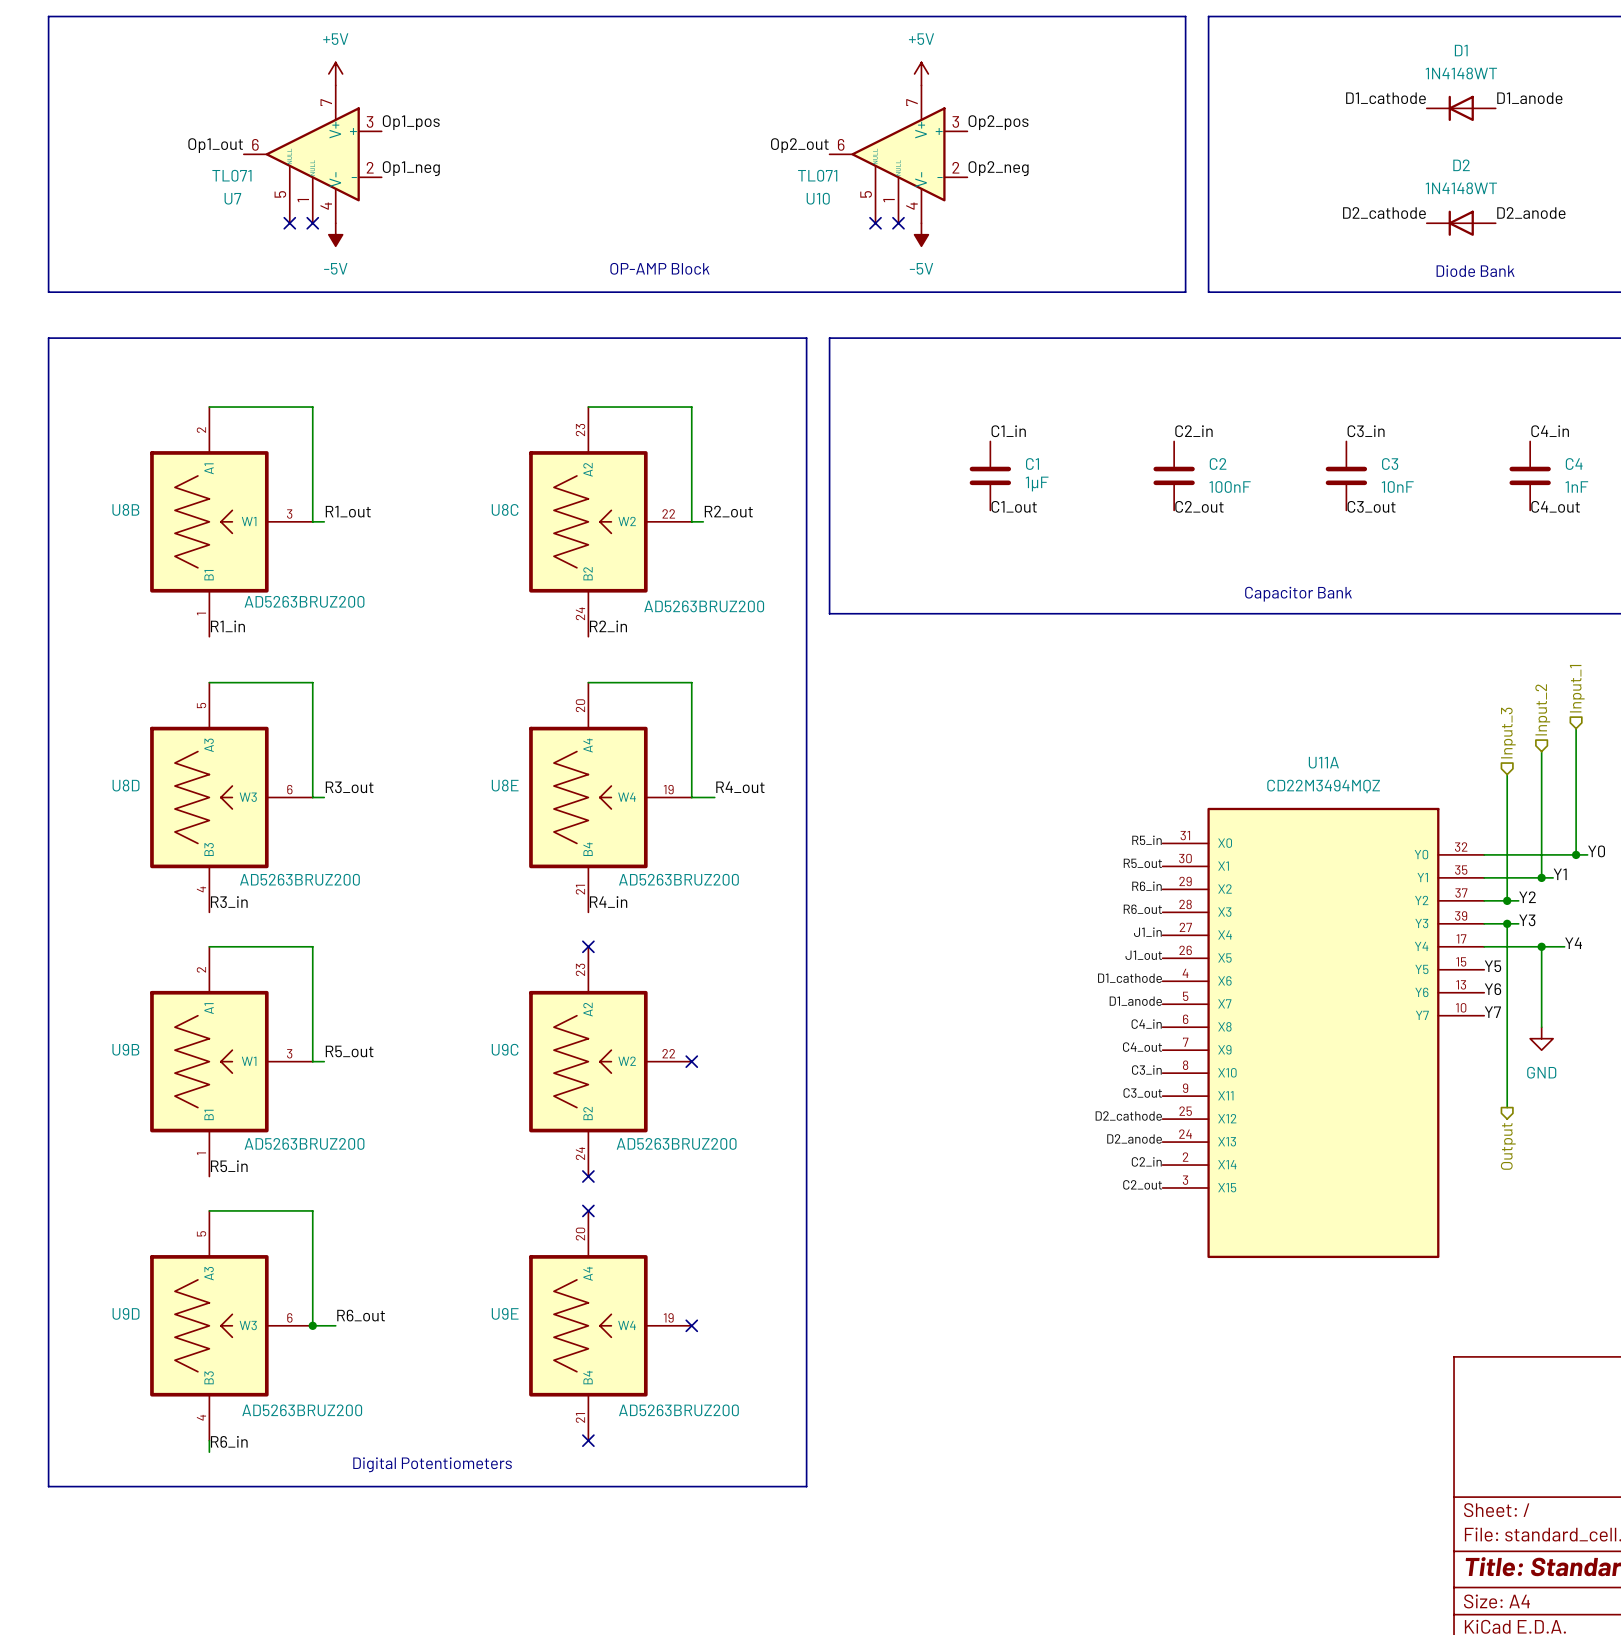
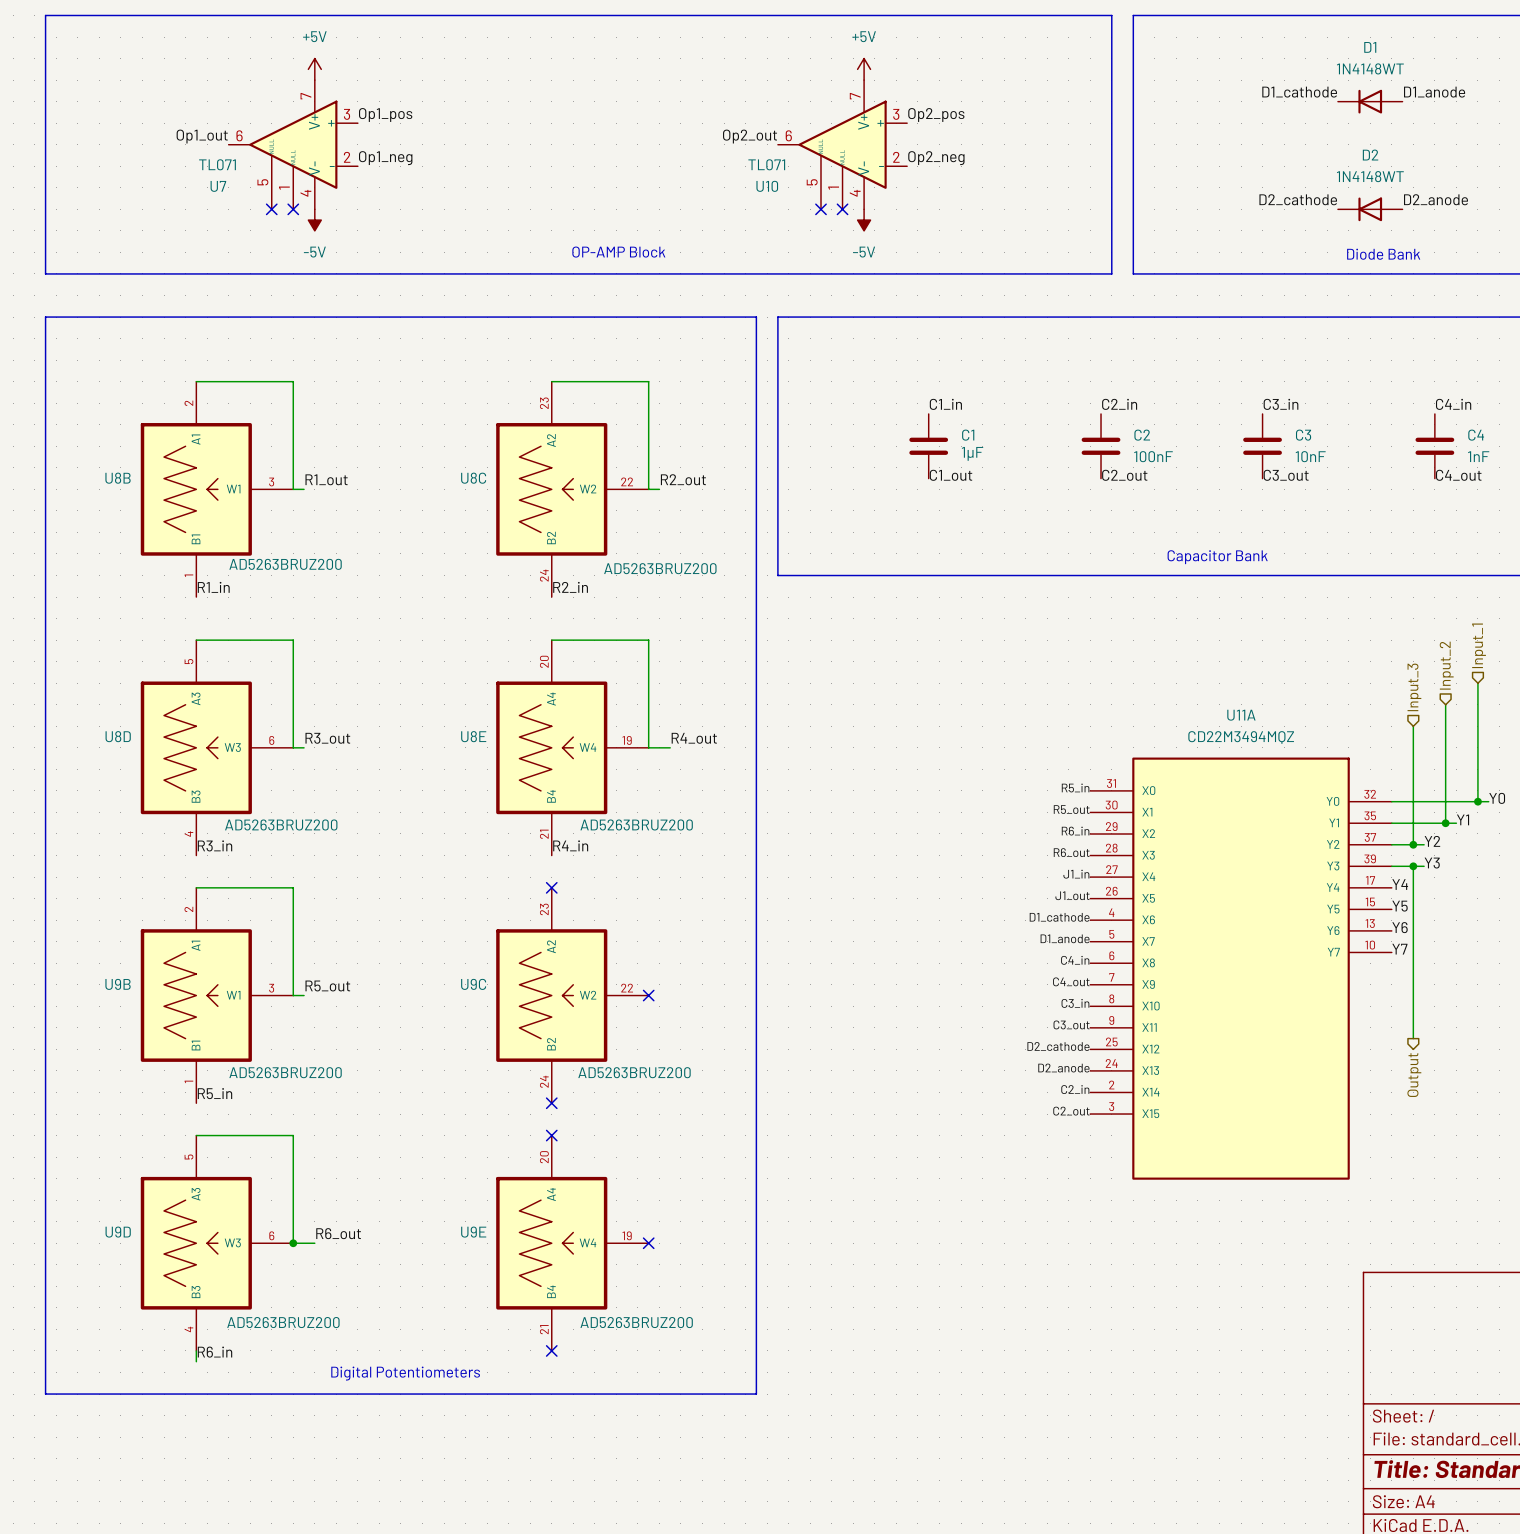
label position: Y4 (1573, 943) -> Y4 (1400, 884)
wire: (1484, 946) (1564, 946) -> none
wire: (1541, 946) (1541, 1027) -> none
junction: (1541, 946) -> none
power symbol: GND (1541, 1038) -> none

